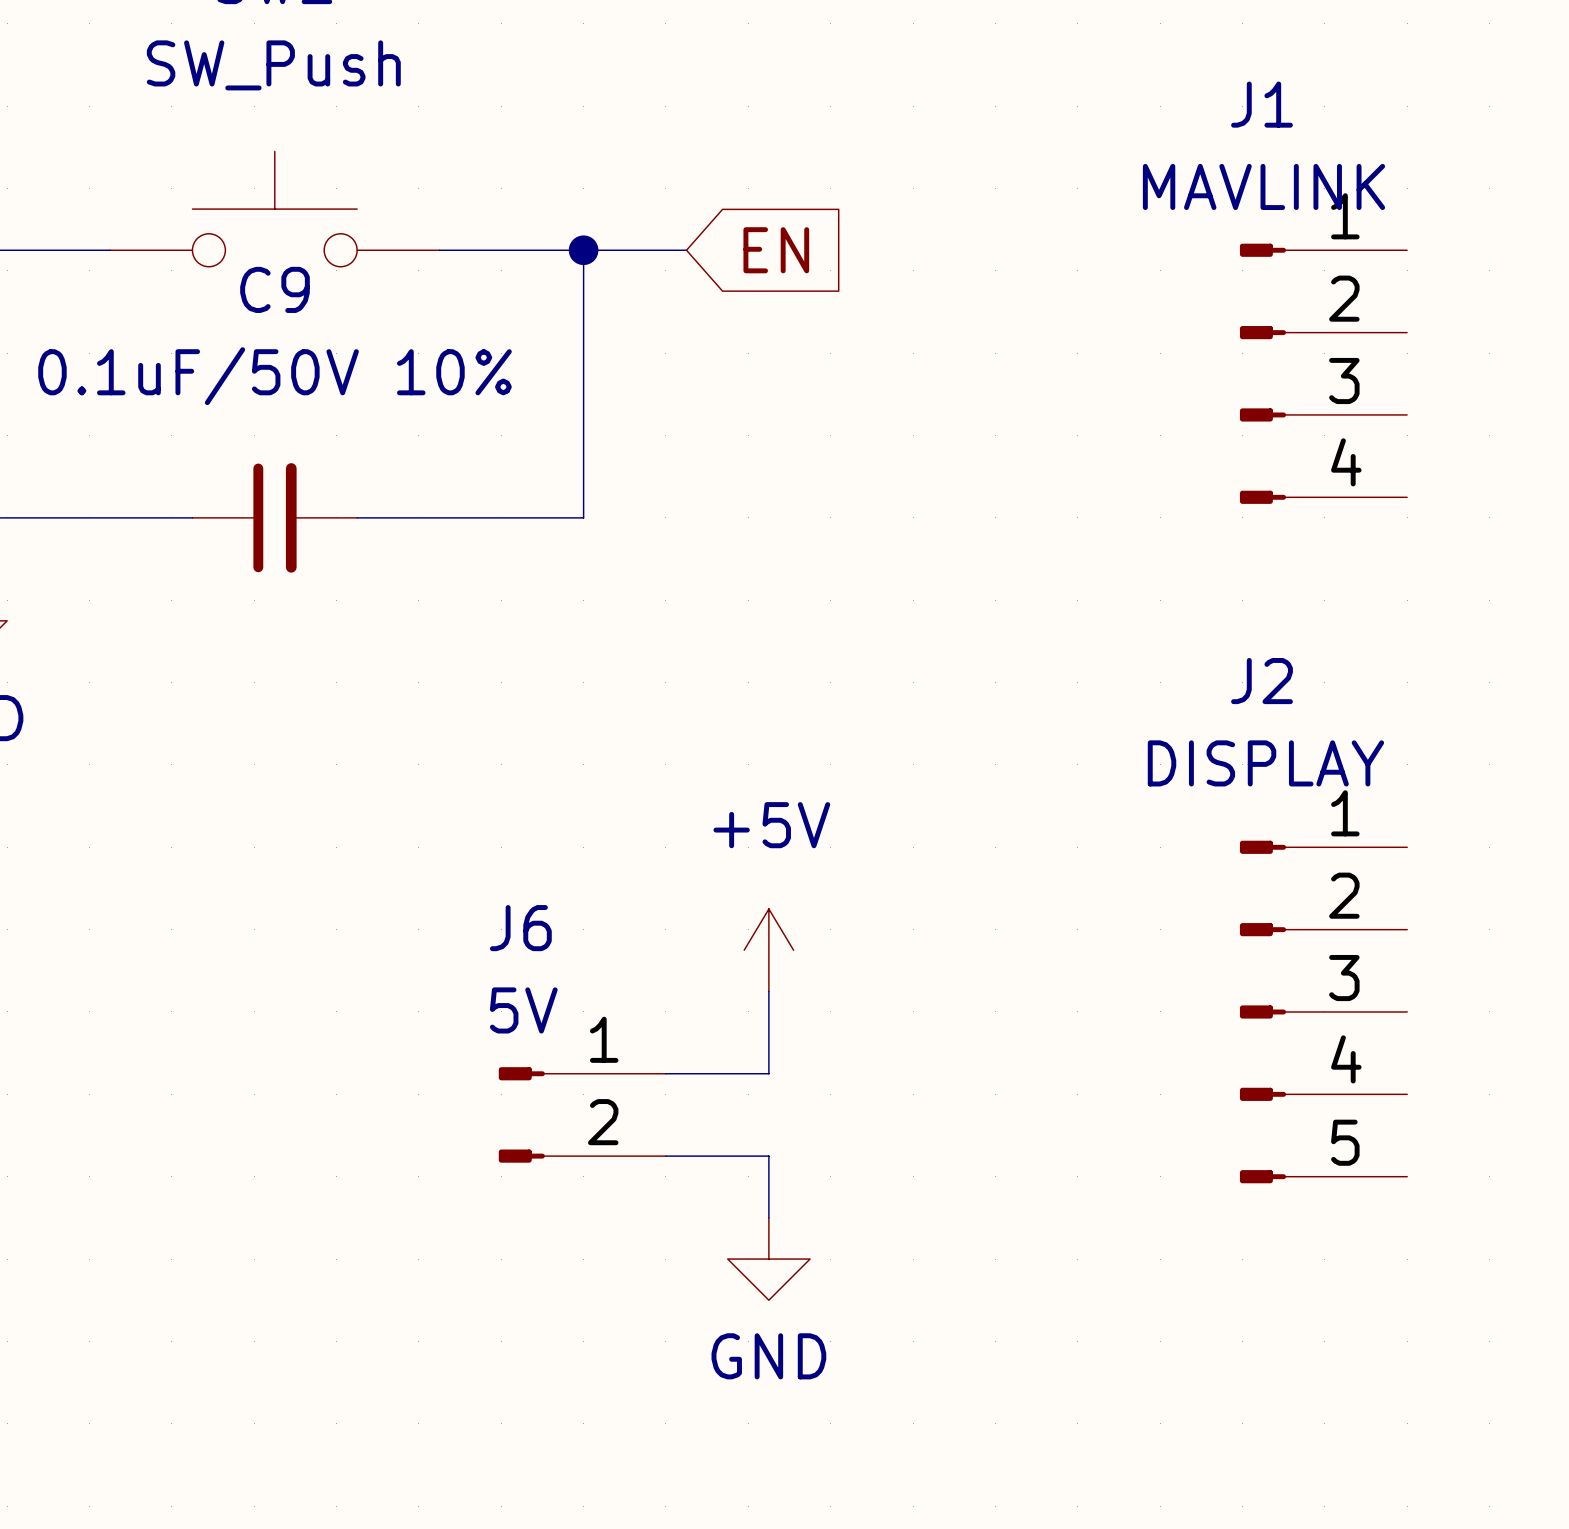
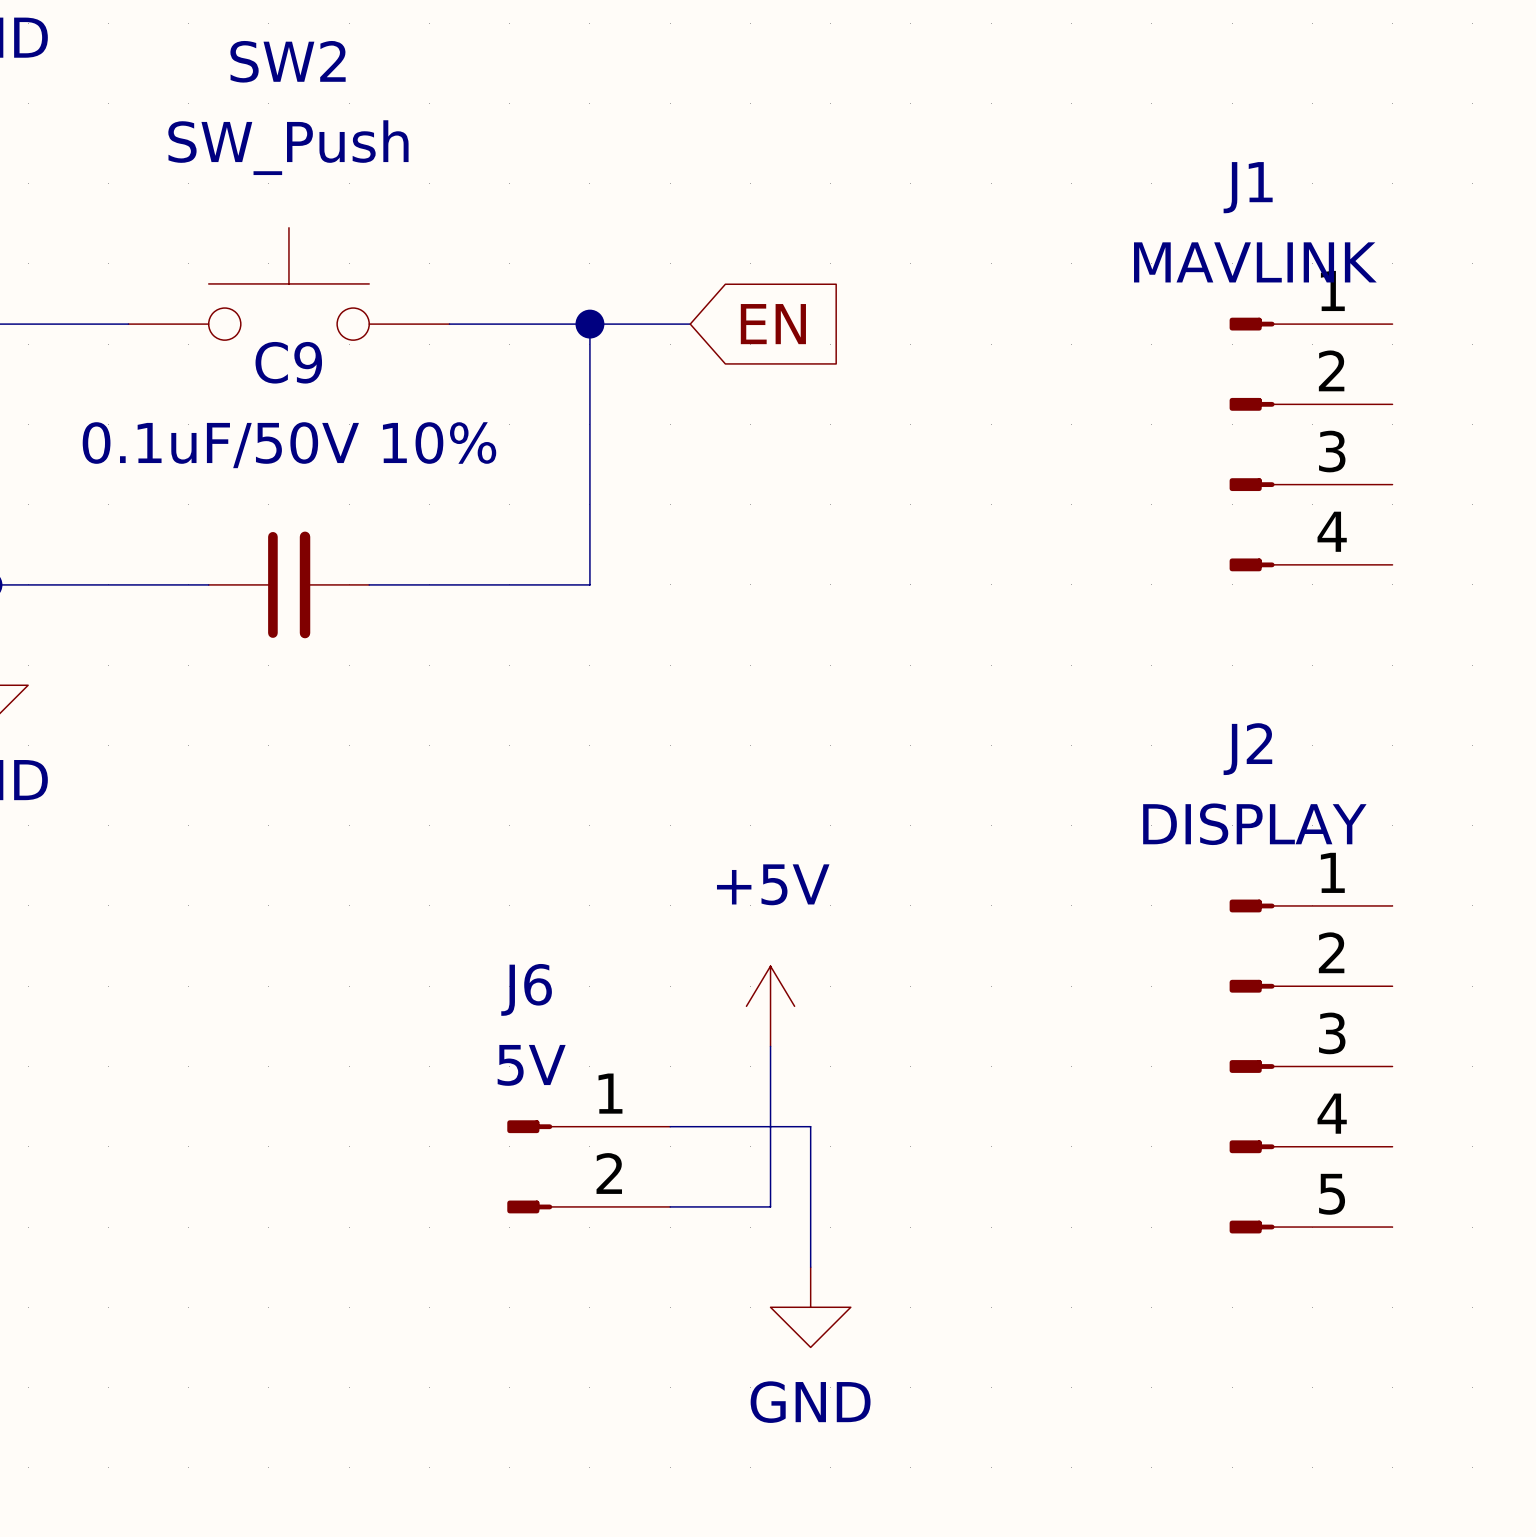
wire: (768, 1156) (768, 1217) -> (770, 1206) (770, 1126) (810, 1126) (810, 1267)
power symbol position: GND (768, 1259) -> GND (810, 1307)

